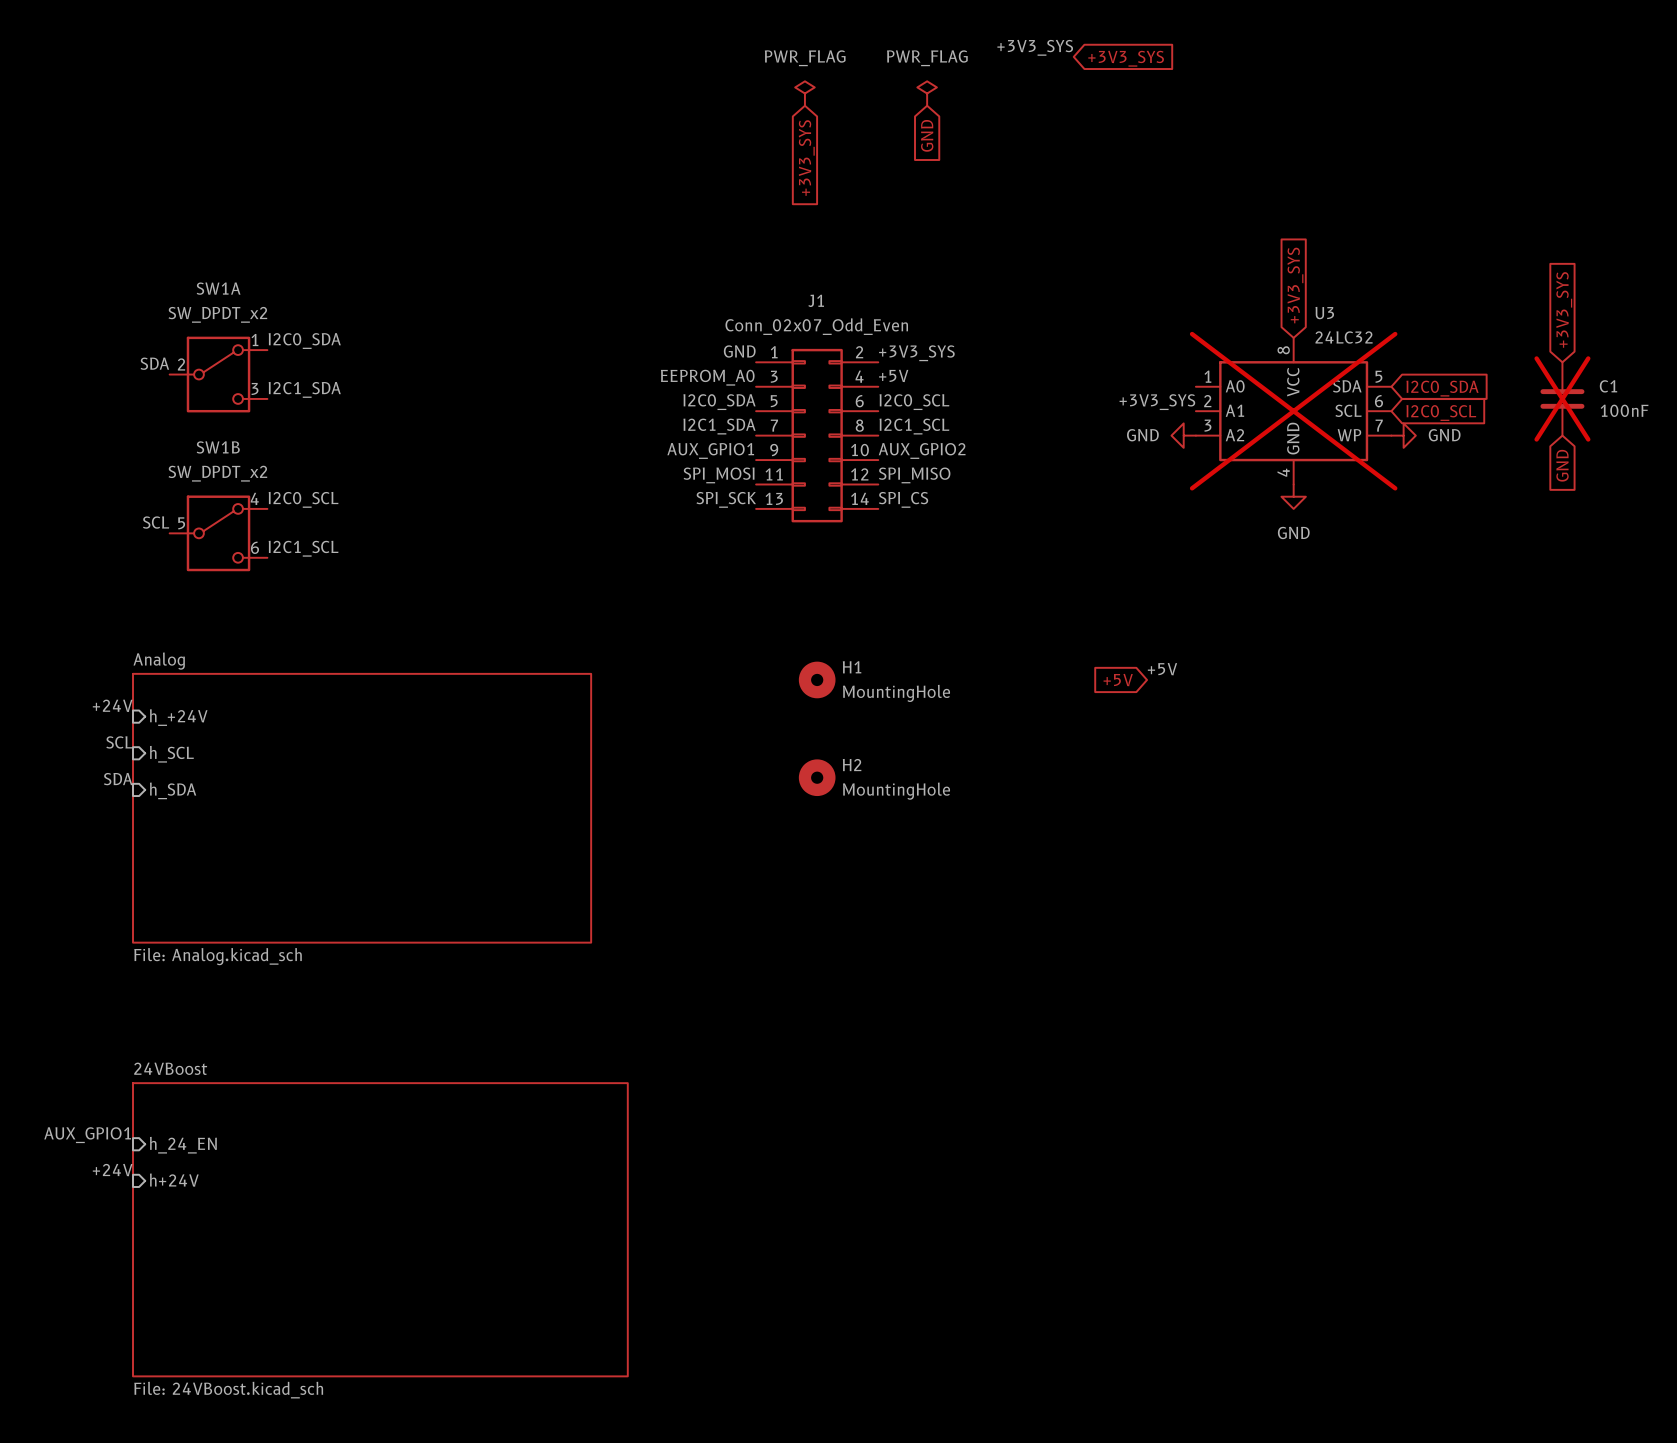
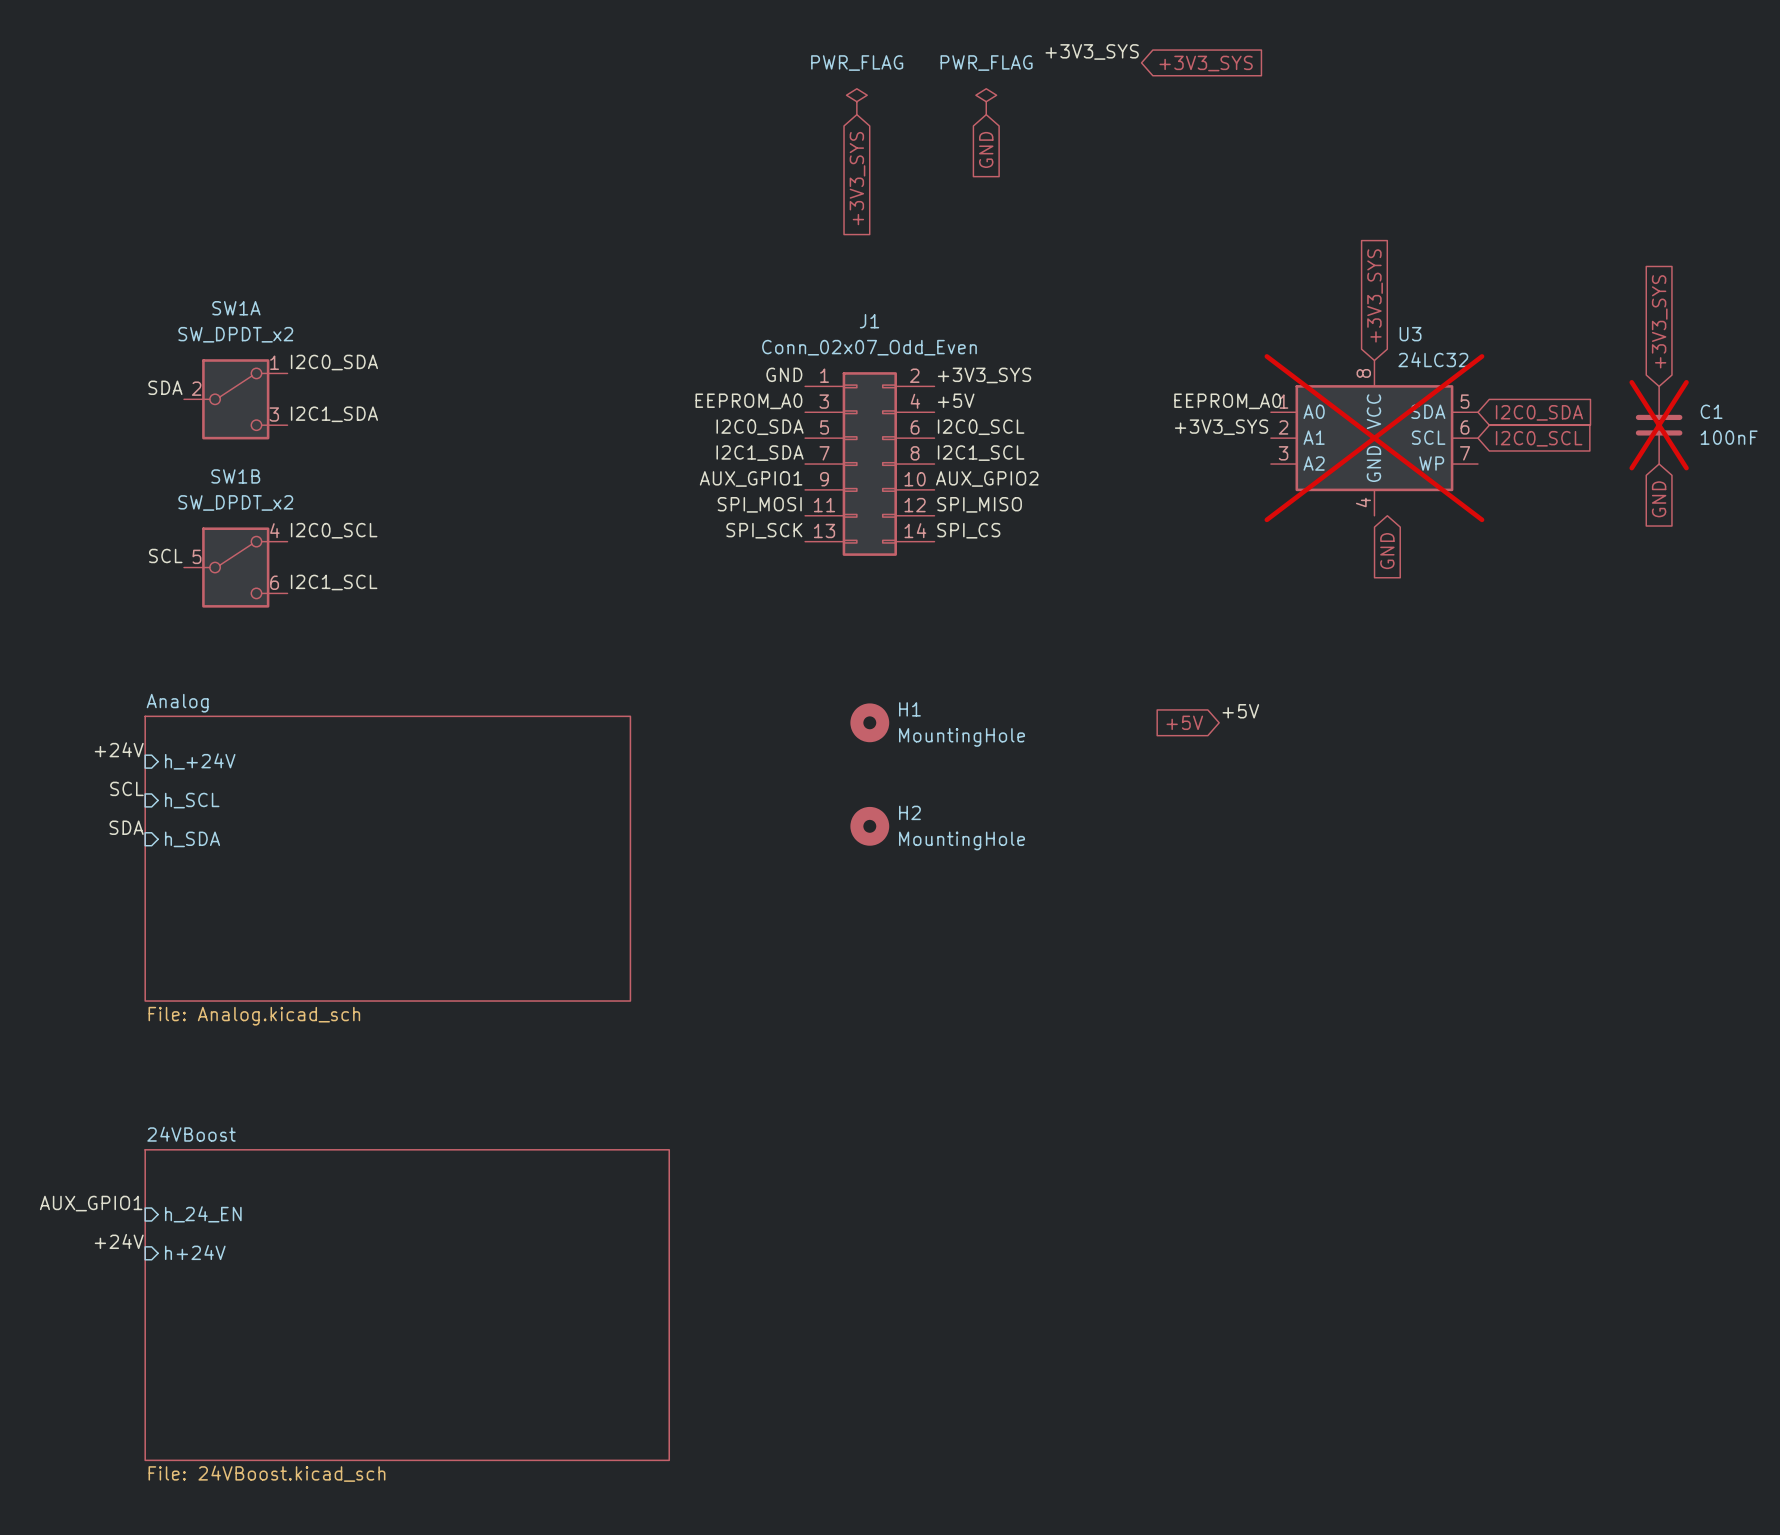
label: none -> EEPROM_A0 (1227, 401)
power symbol: GND (1183, 435) -> none
power symbol: GND (1403, 435) -> none
power symbol: GND (1293, 496) -> none
global label: none -> GND (1387, 551)

